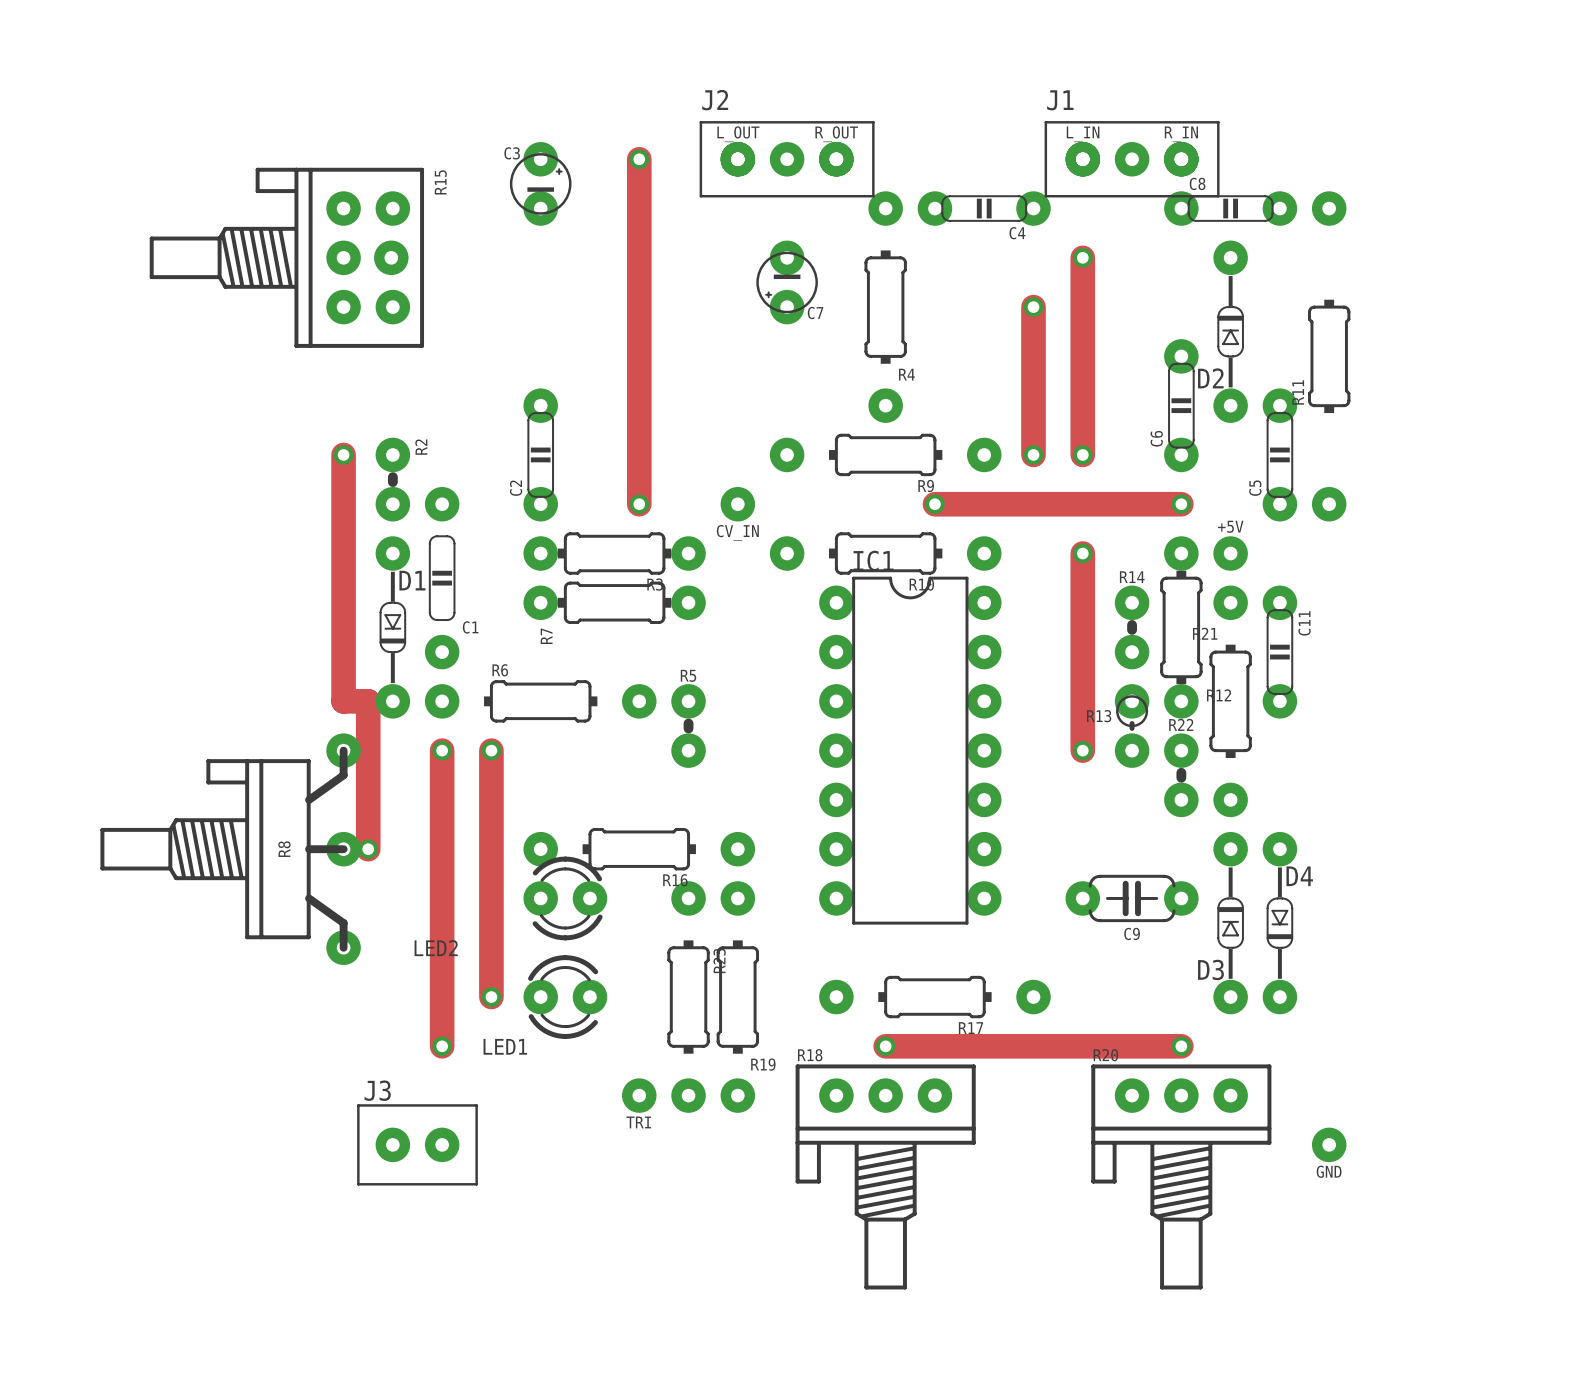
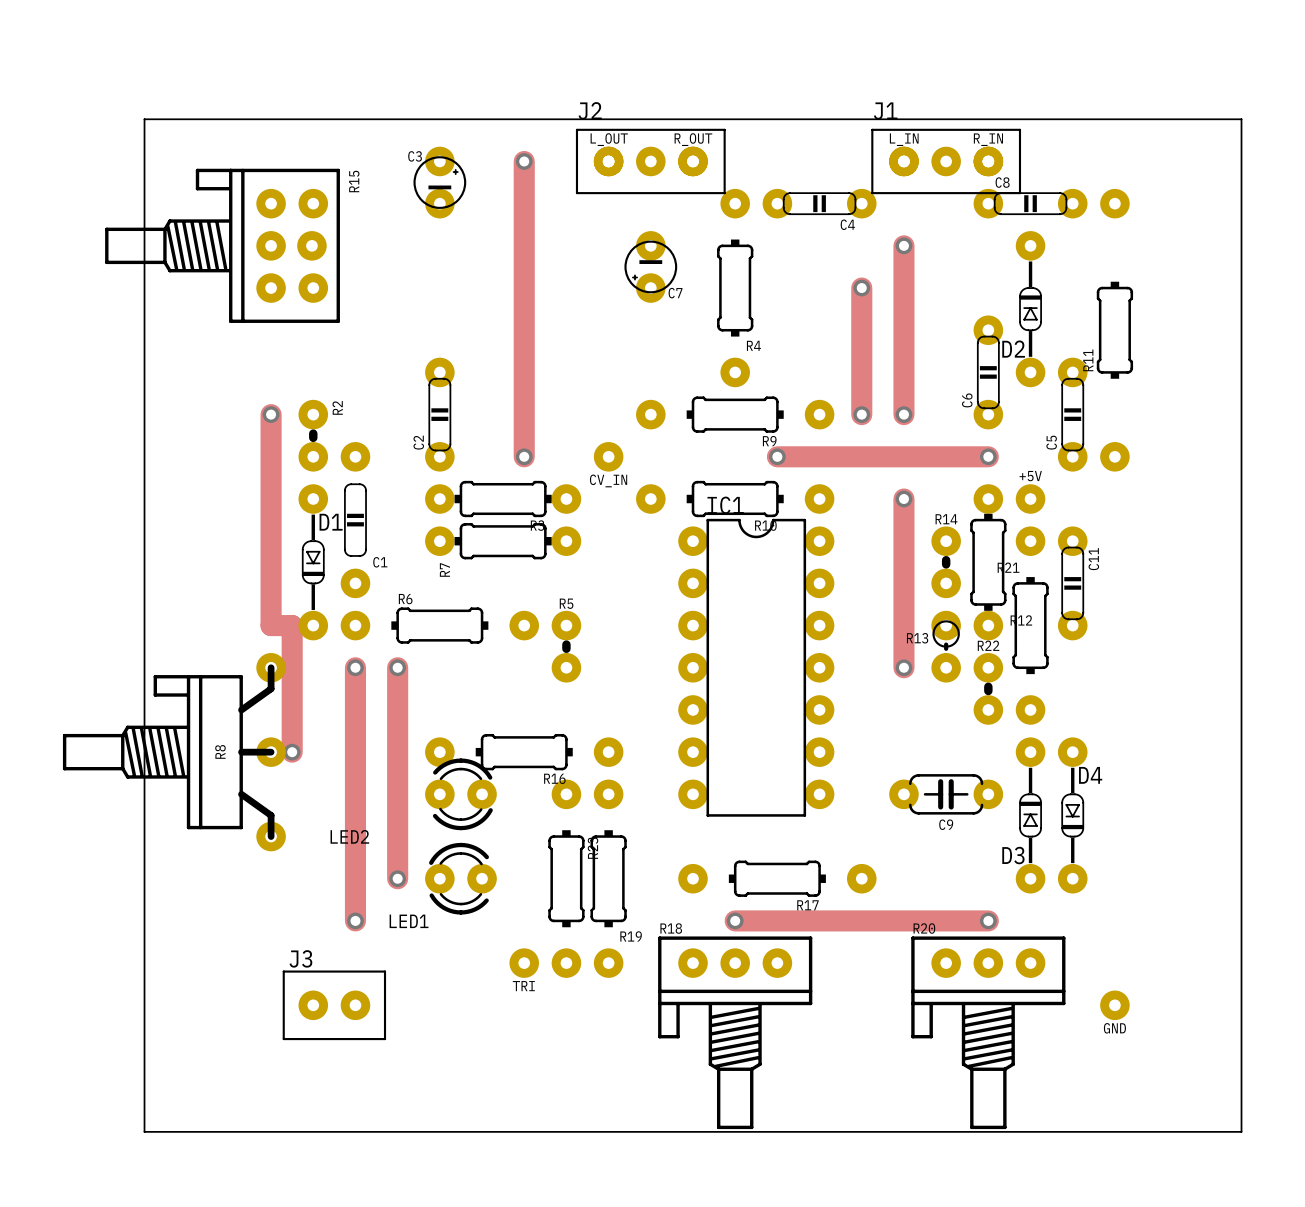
board edge: none -> (144, 119) (1241, 119) (1241, 1131) (144, 1131) (144, 119)

